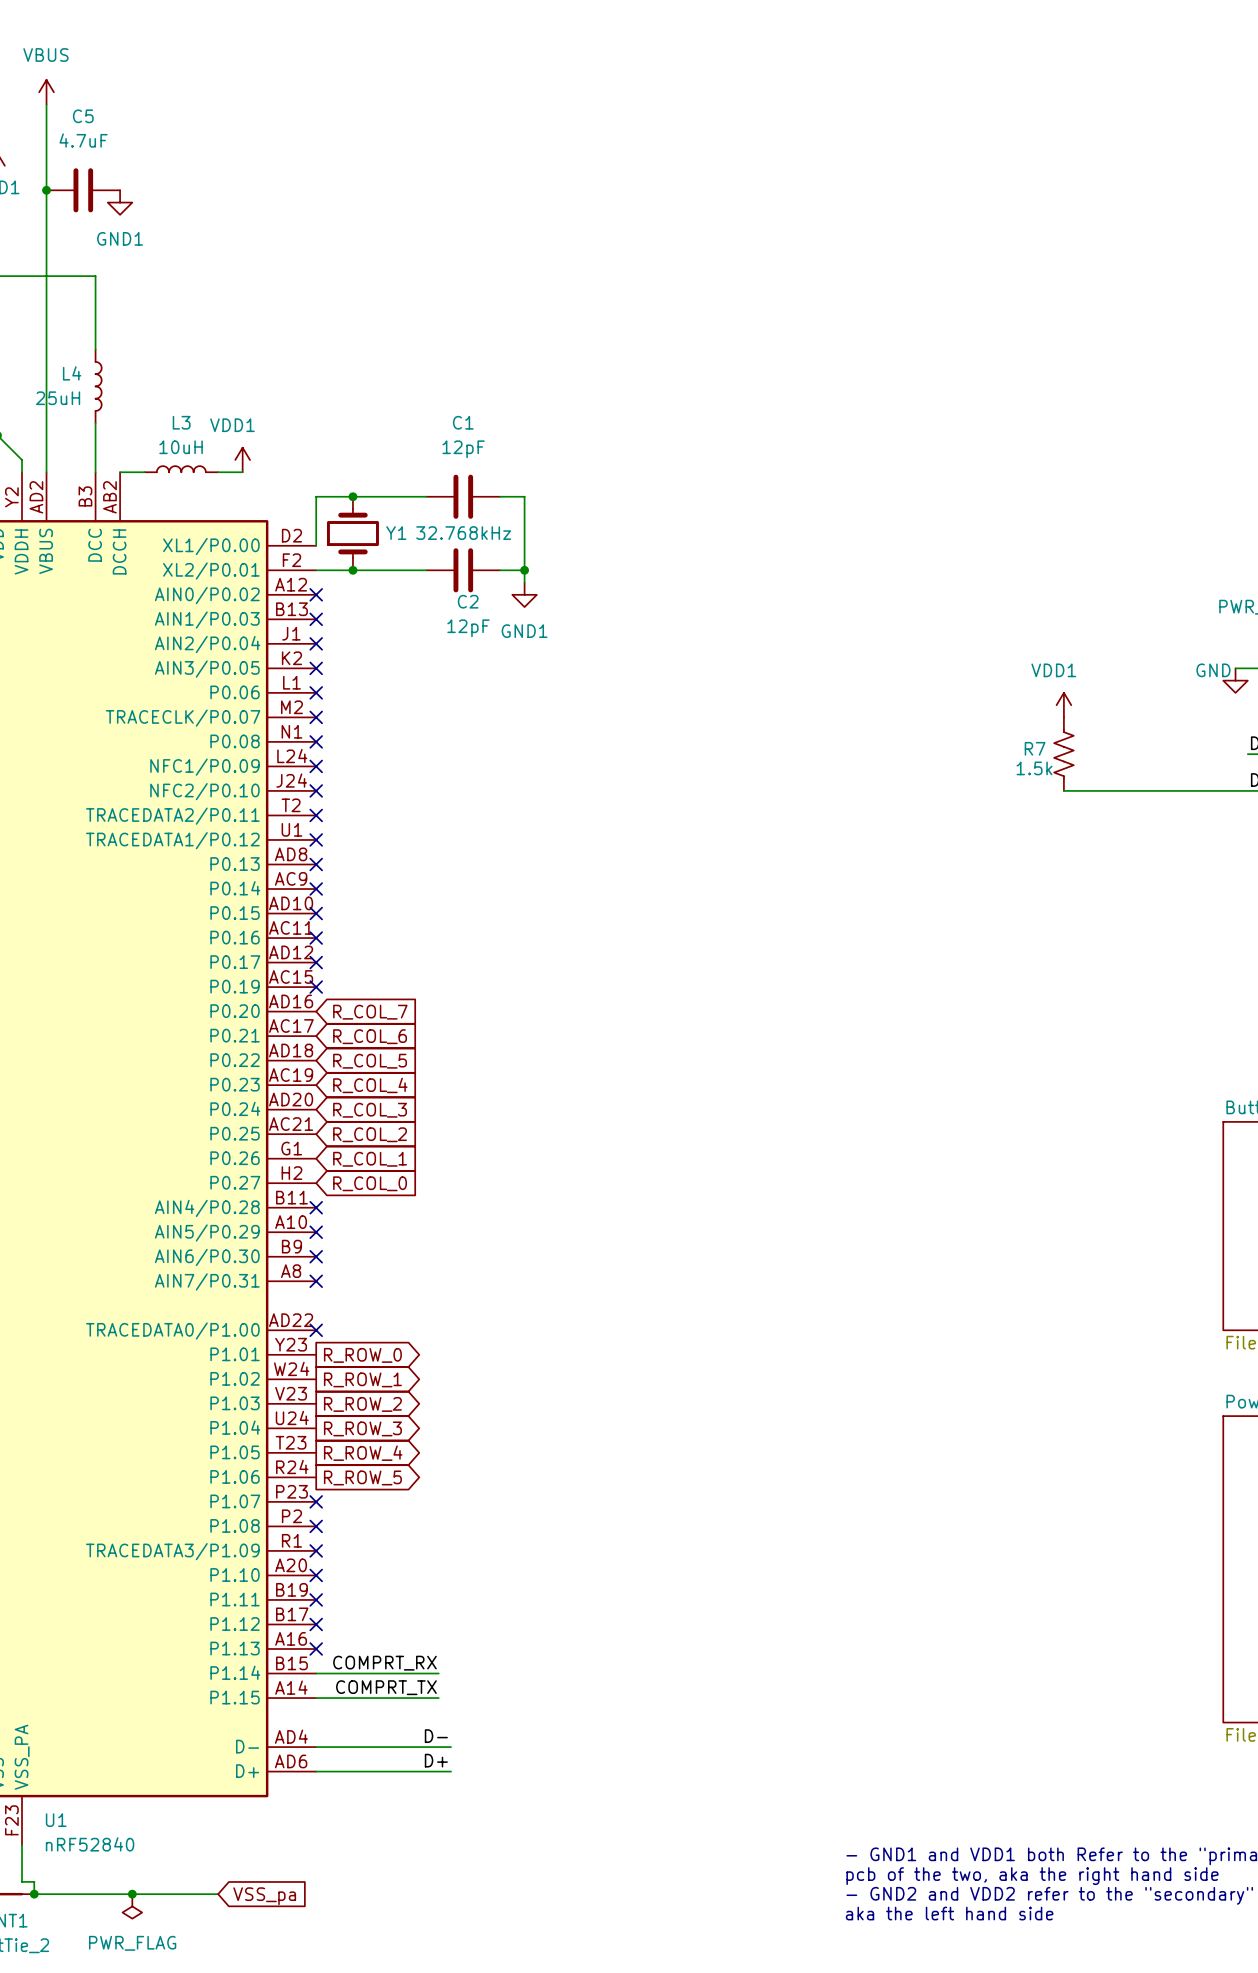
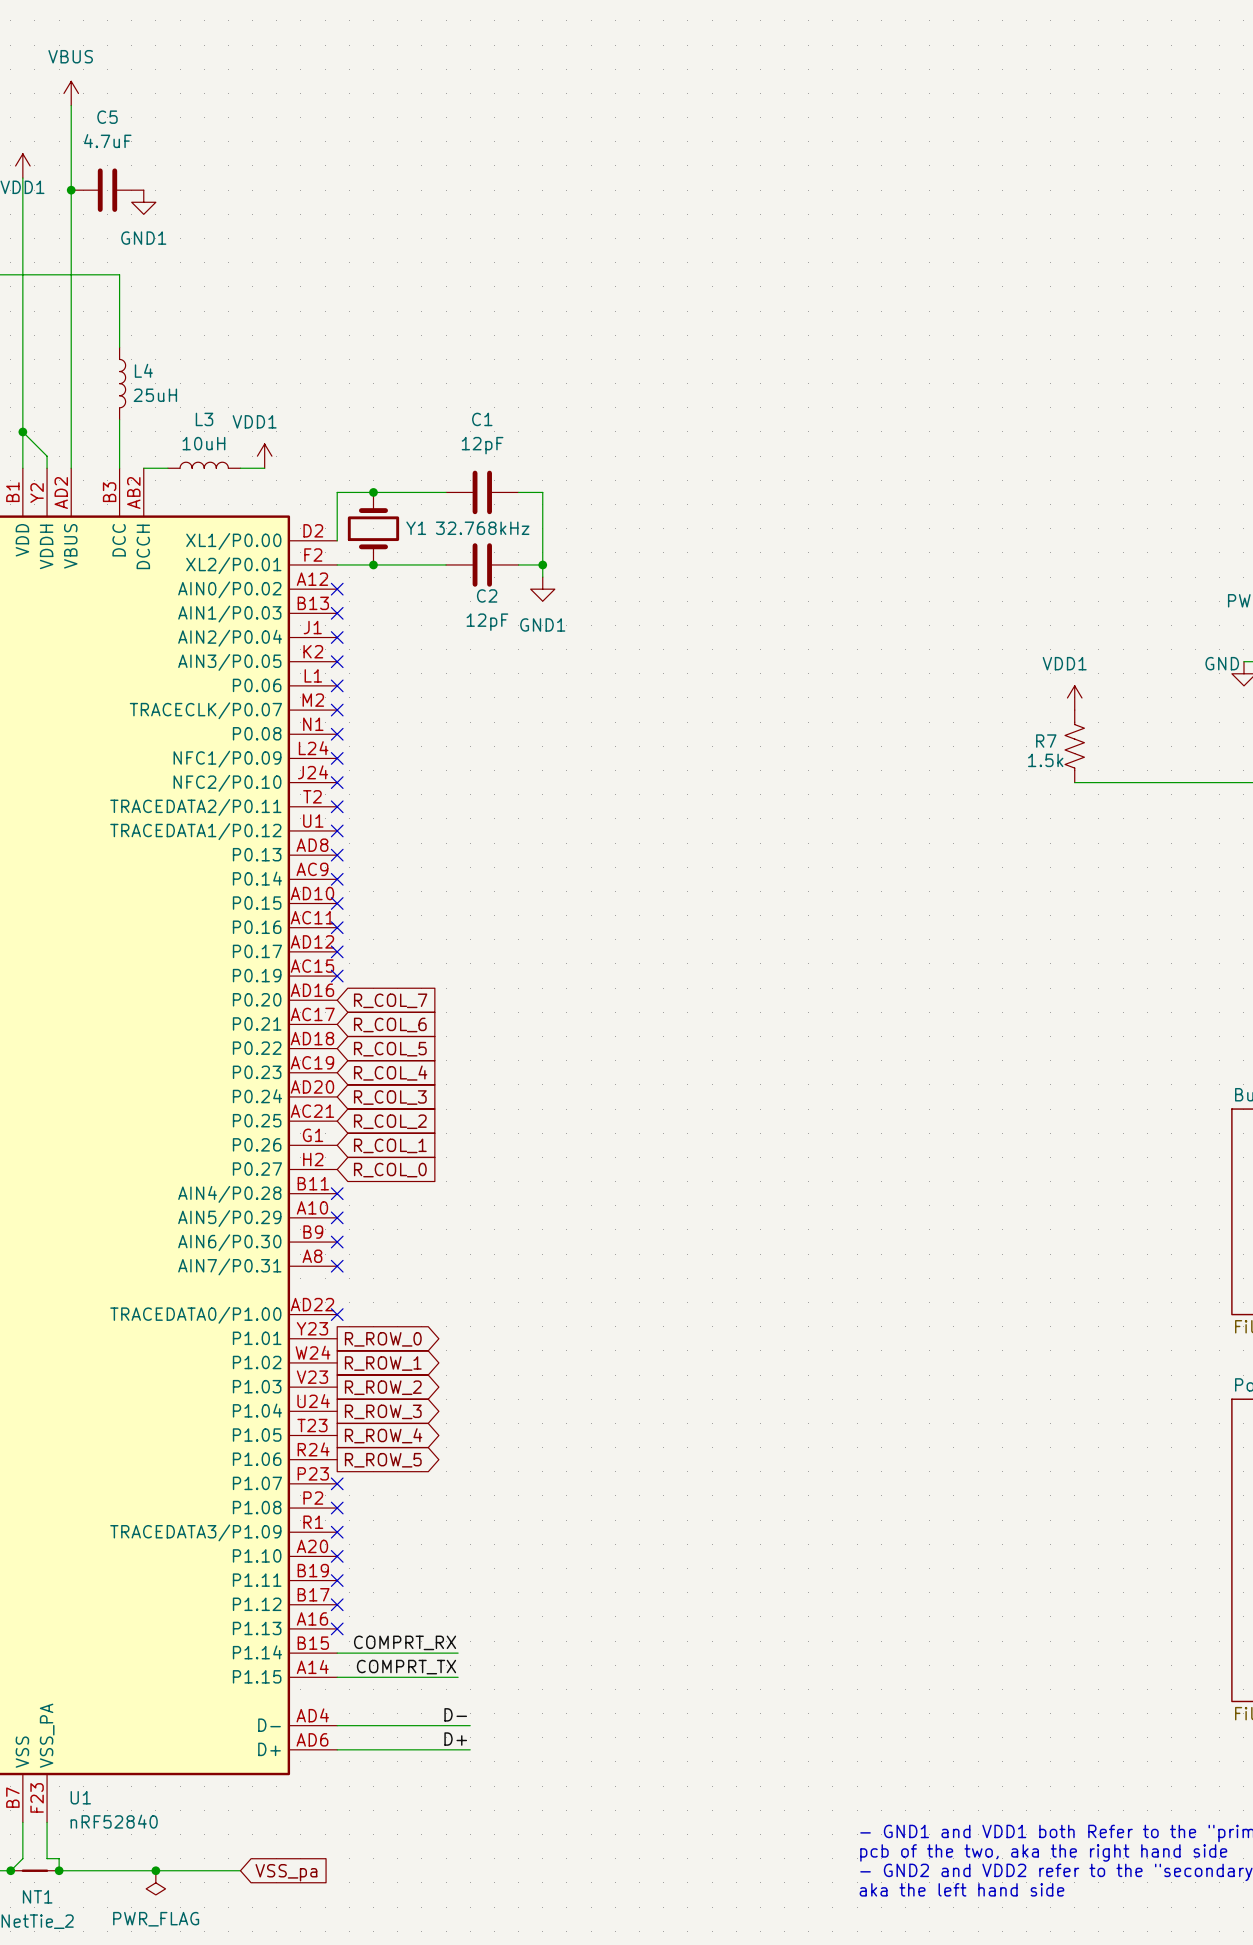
L4 name position: L4 (72, 373) -> L4 (143, 370)
L4 value position: 25uH (58, 398) -> 25uH (155, 395)

